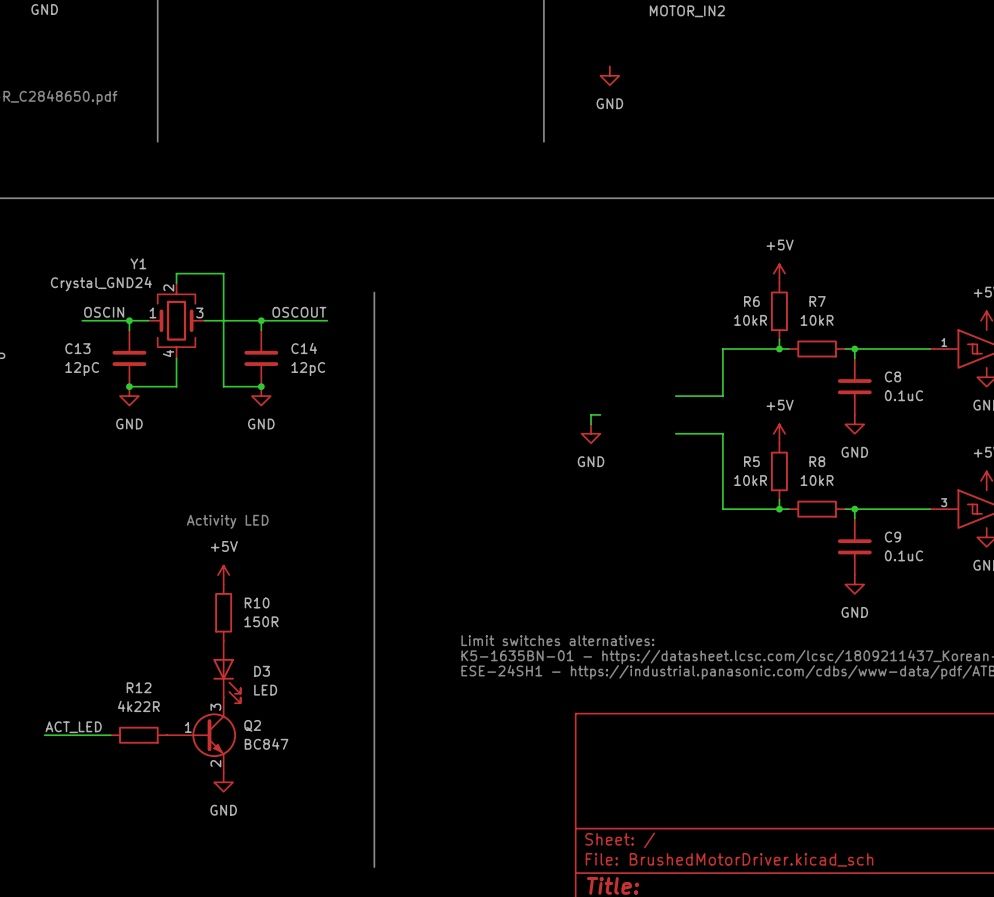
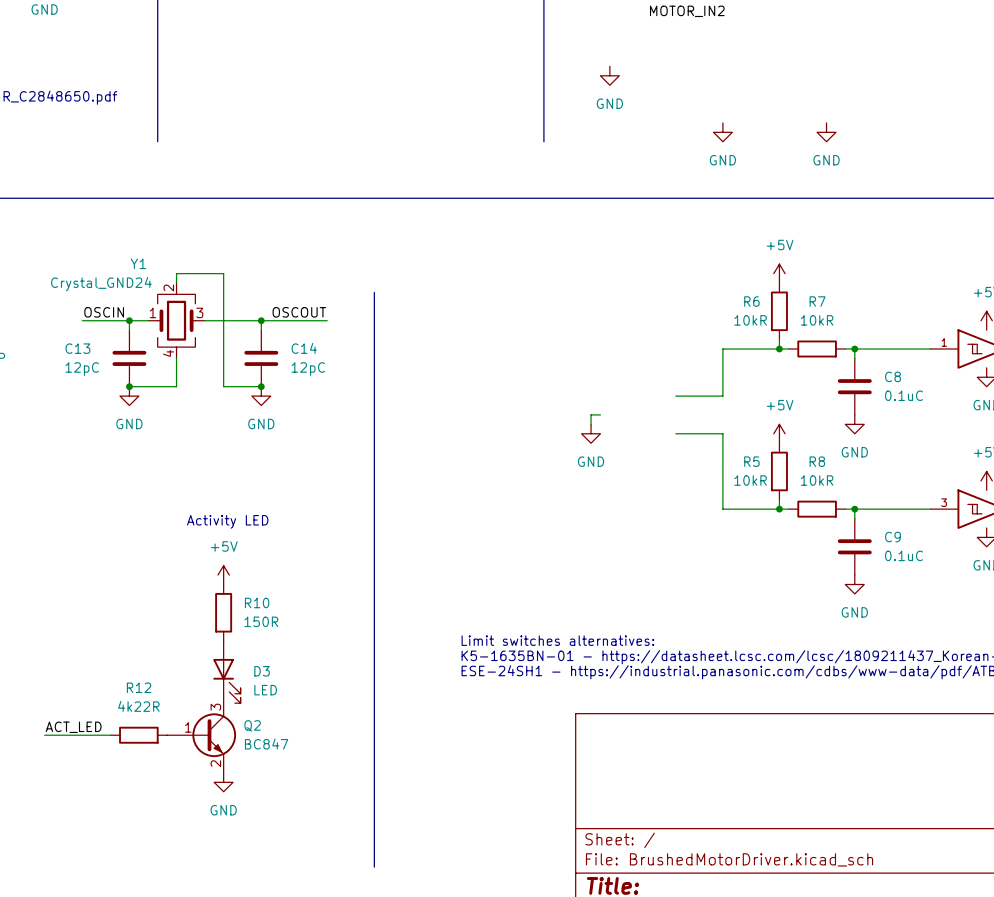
power symbol: none -> GND (722, 132)
power symbol: none -> GND (826, 132)

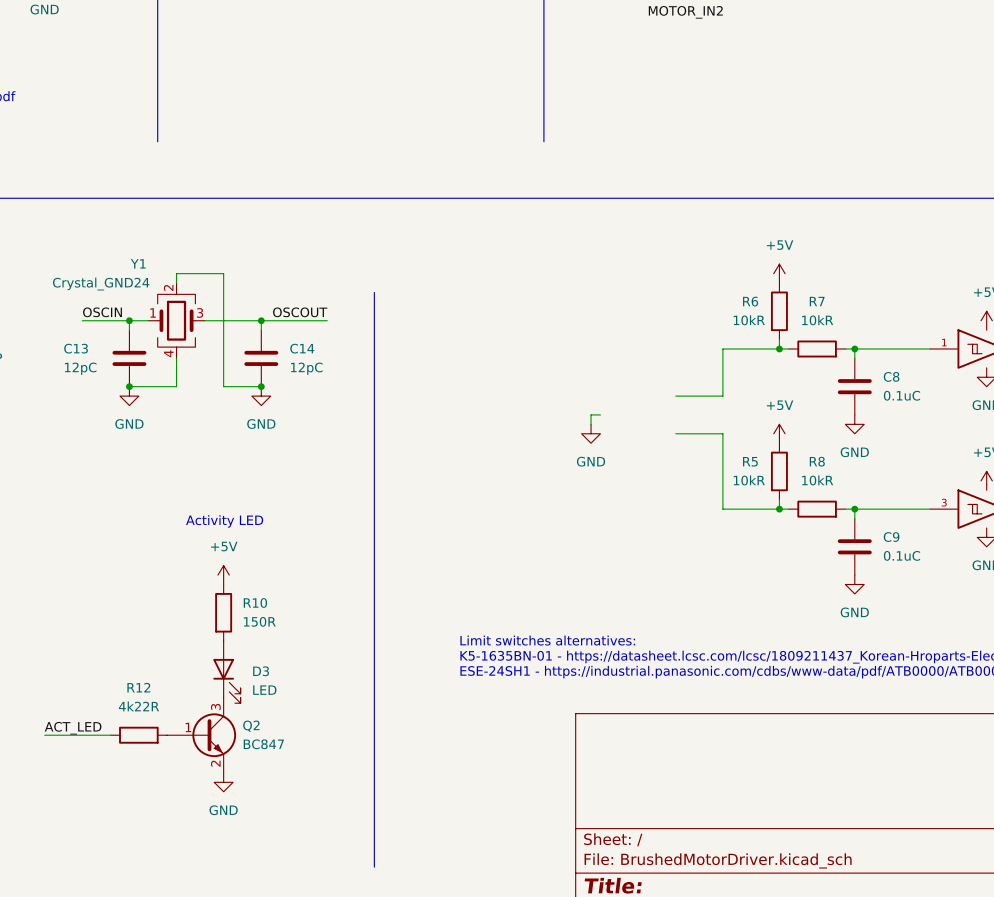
power symbol: GND (609, 75) -> none
power symbol: GND (722, 132) -> none
power symbol: GND (826, 132) -> none

